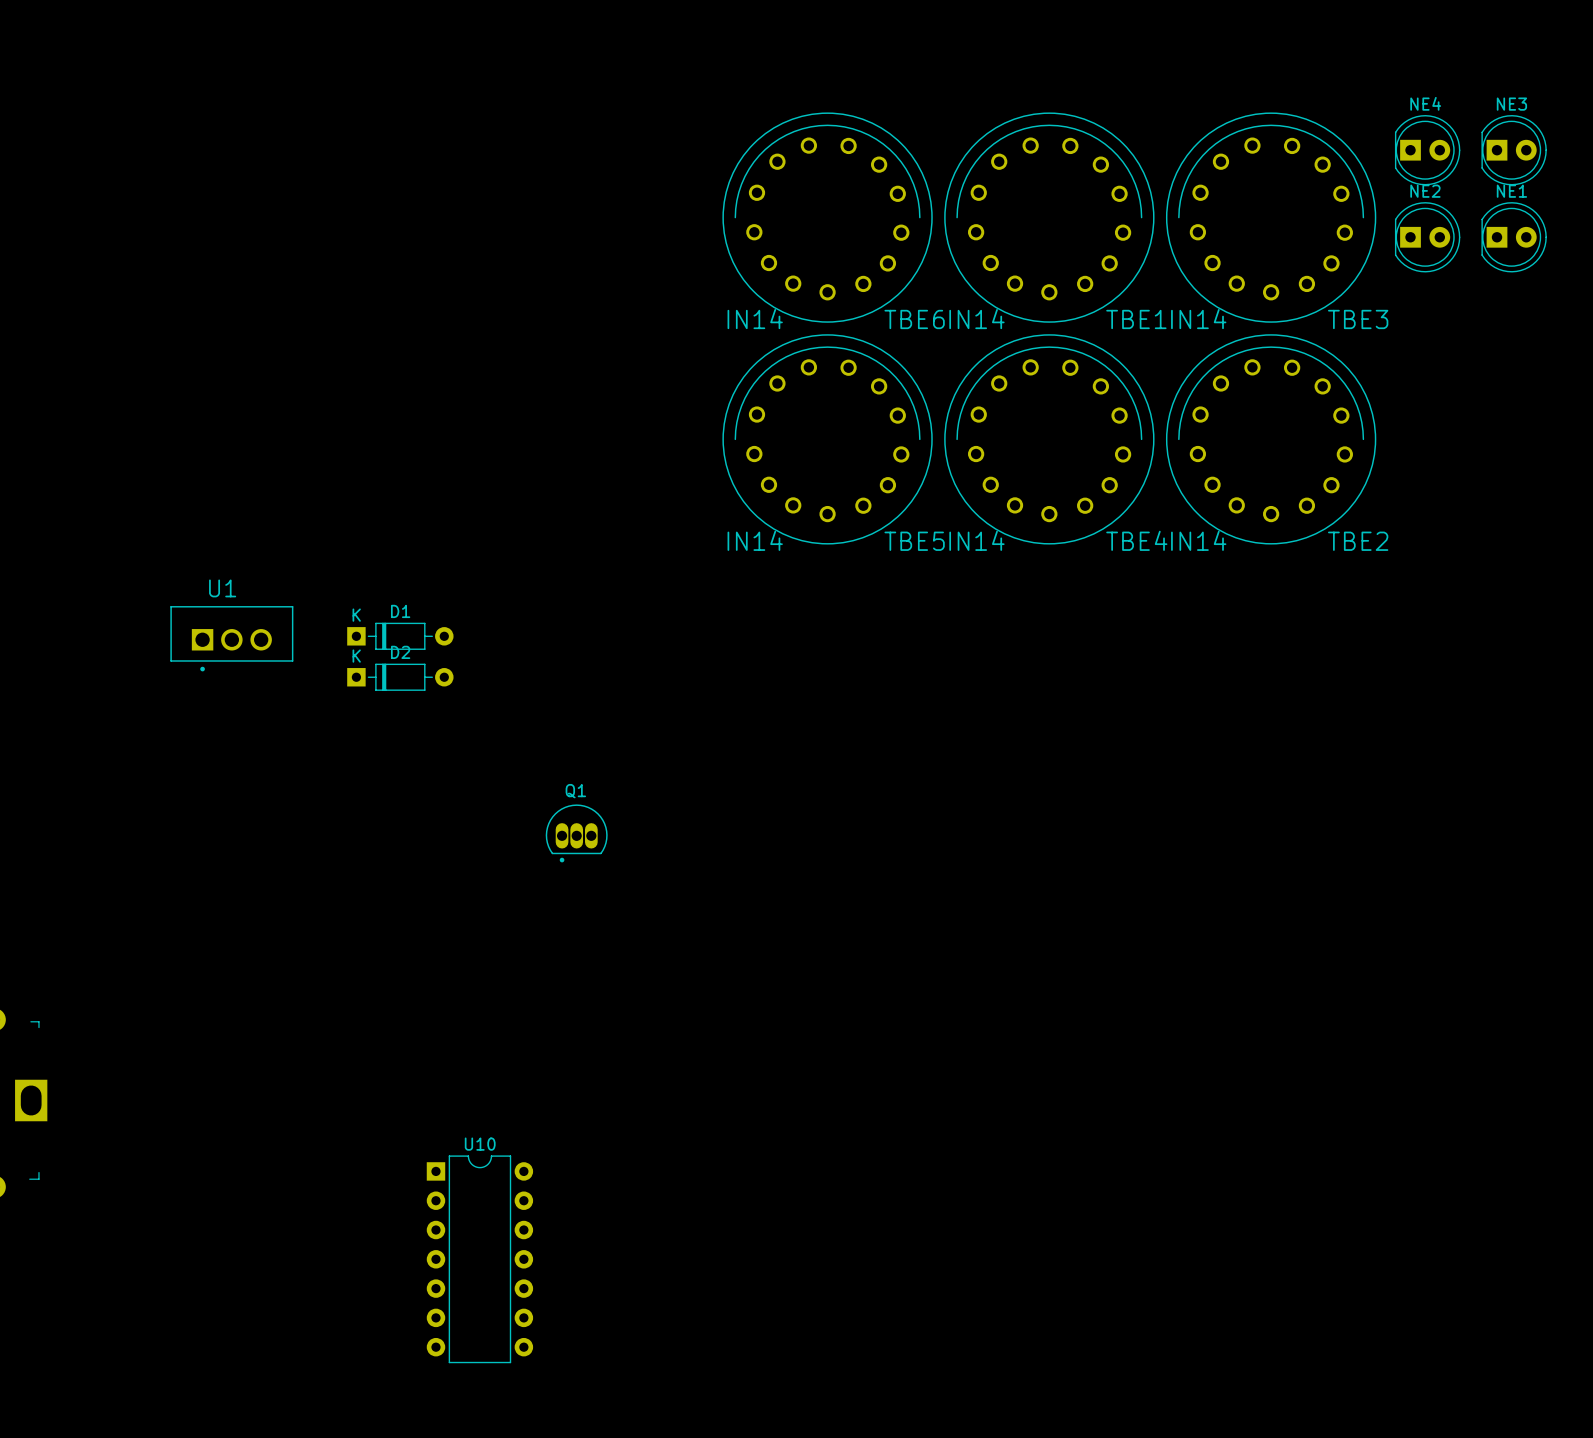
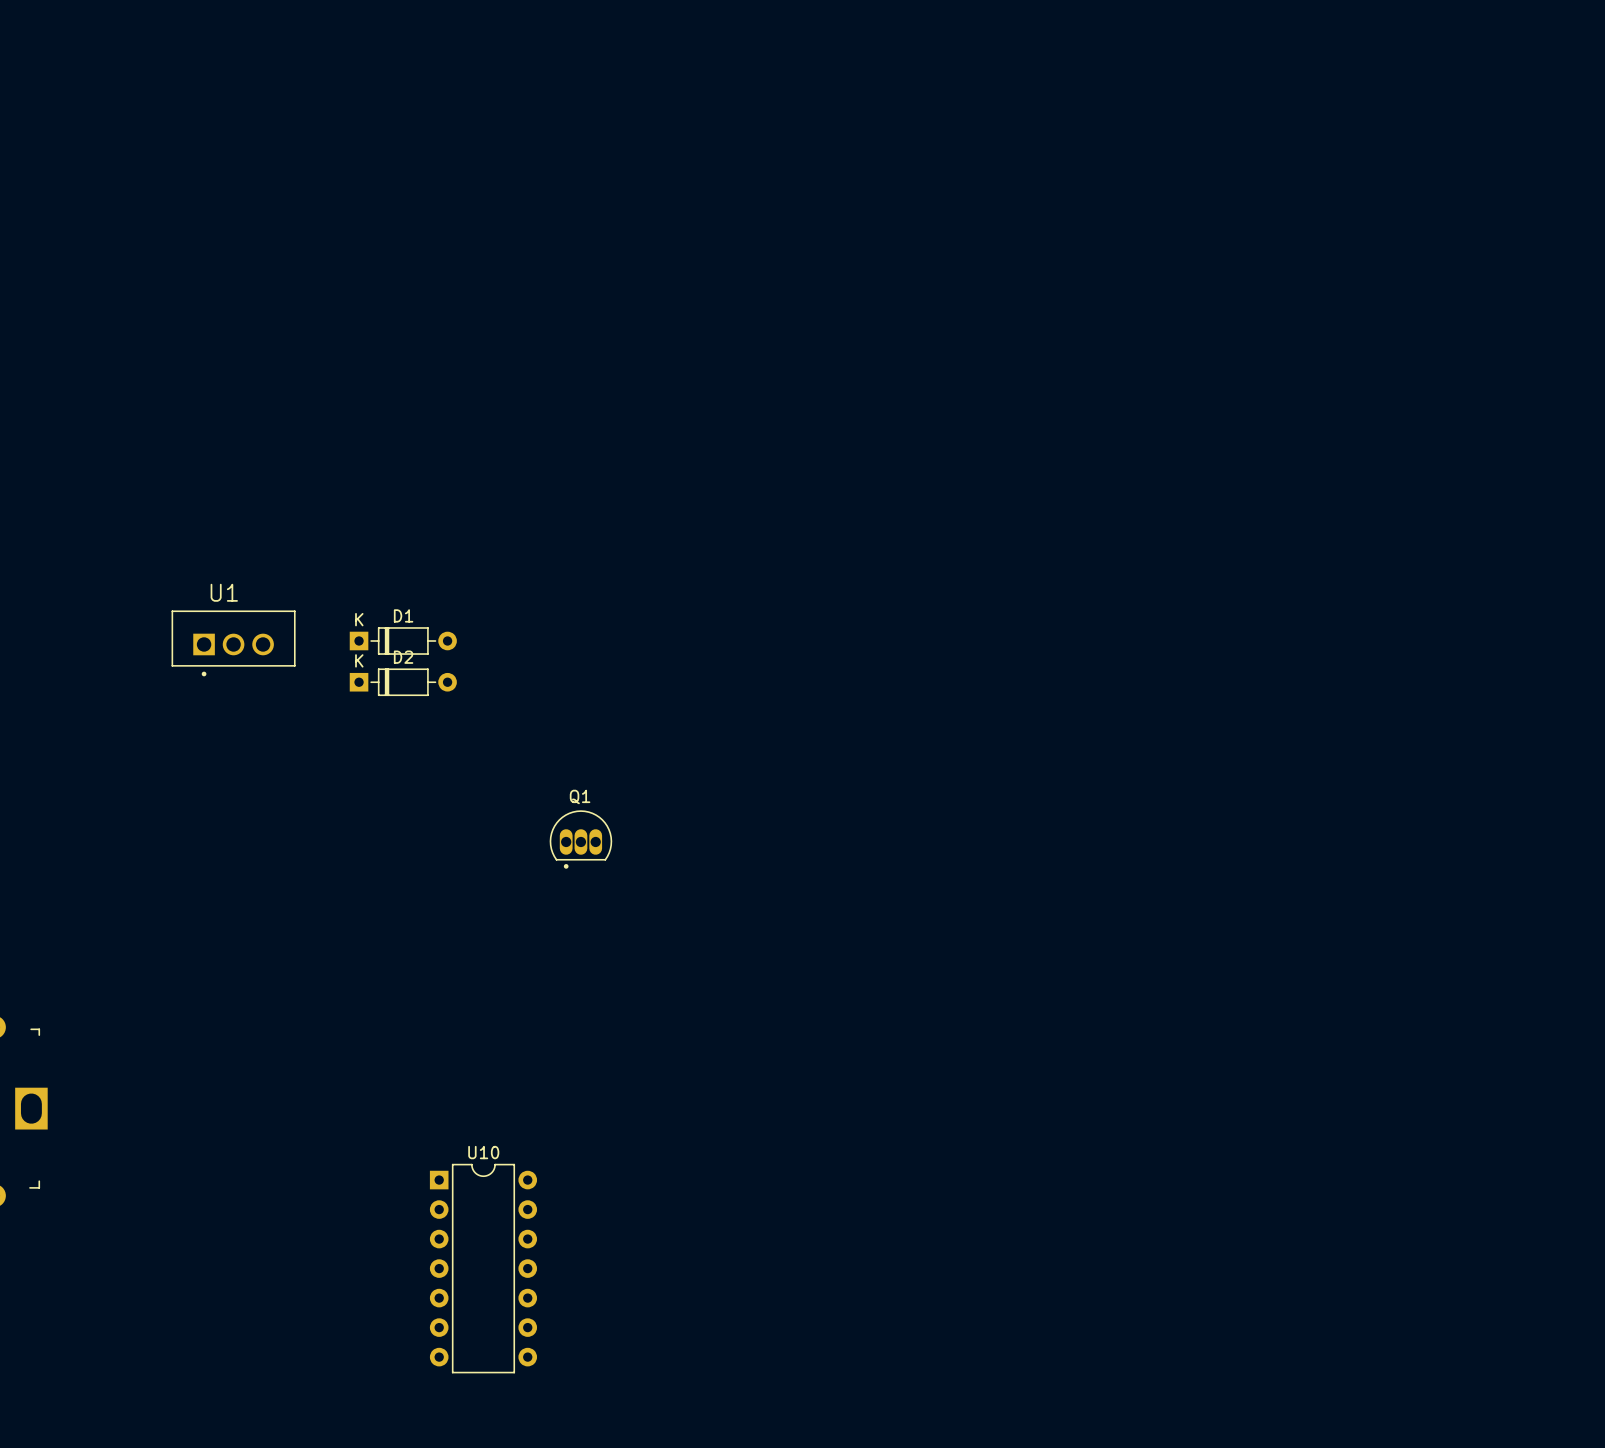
NE4: (1427, 150) -> none
NE3: (1514, 150) -> none
TBE6: IN14 (827, 217) -> none
TBE1: IN14 (1049, 217) -> none
TBE3: IN14 (1271, 217) -> none
NE2: (1427, 237) -> none
NE1: (1514, 237) -> none
TBE5: IN14 (827, 439) -> none
TBE4: IN14 (1049, 439) -> none
TBE2: IN14 (1271, 439) -> none

